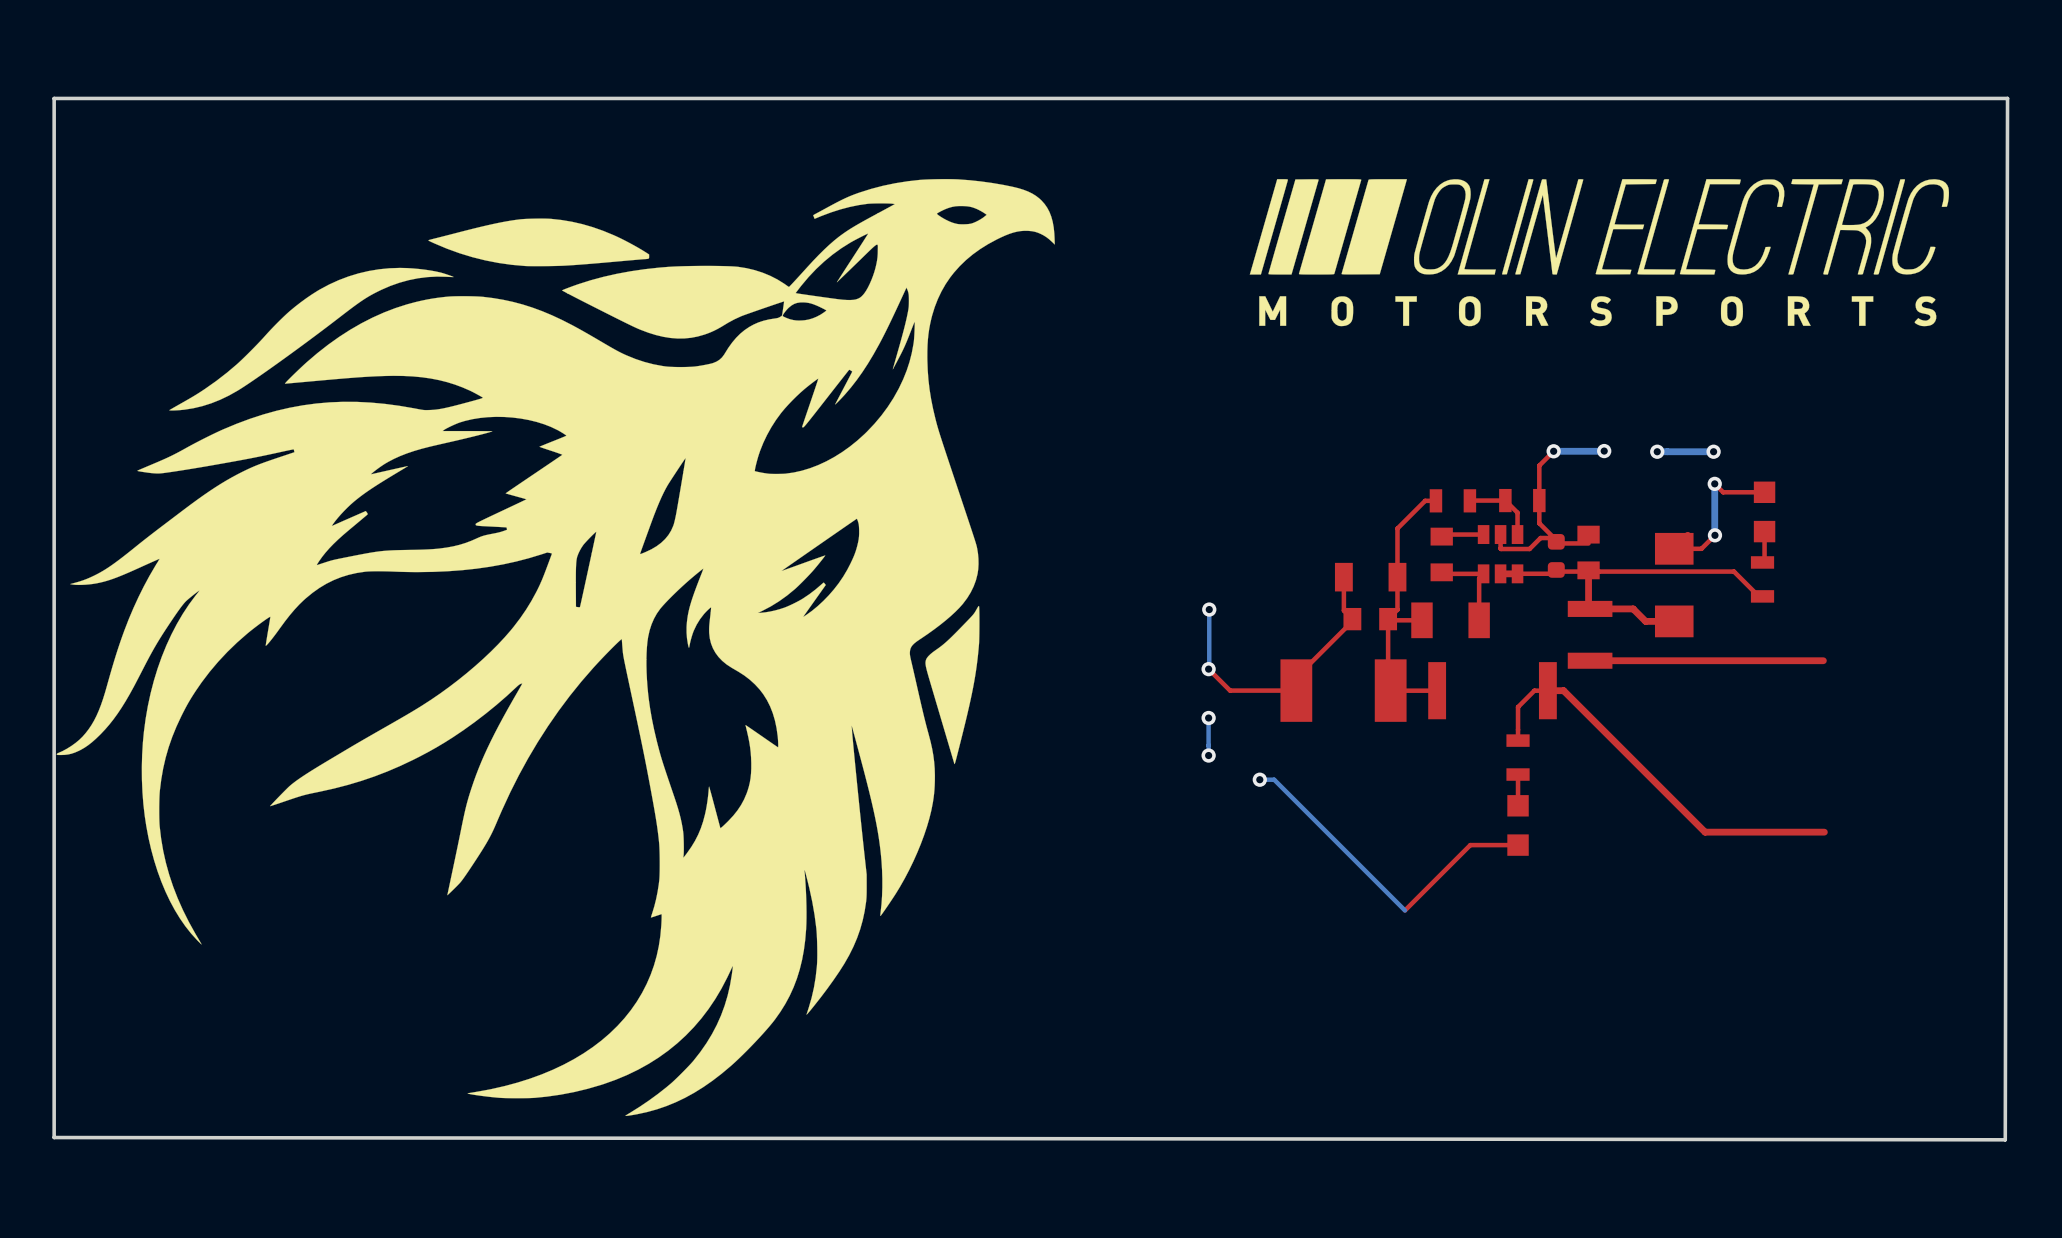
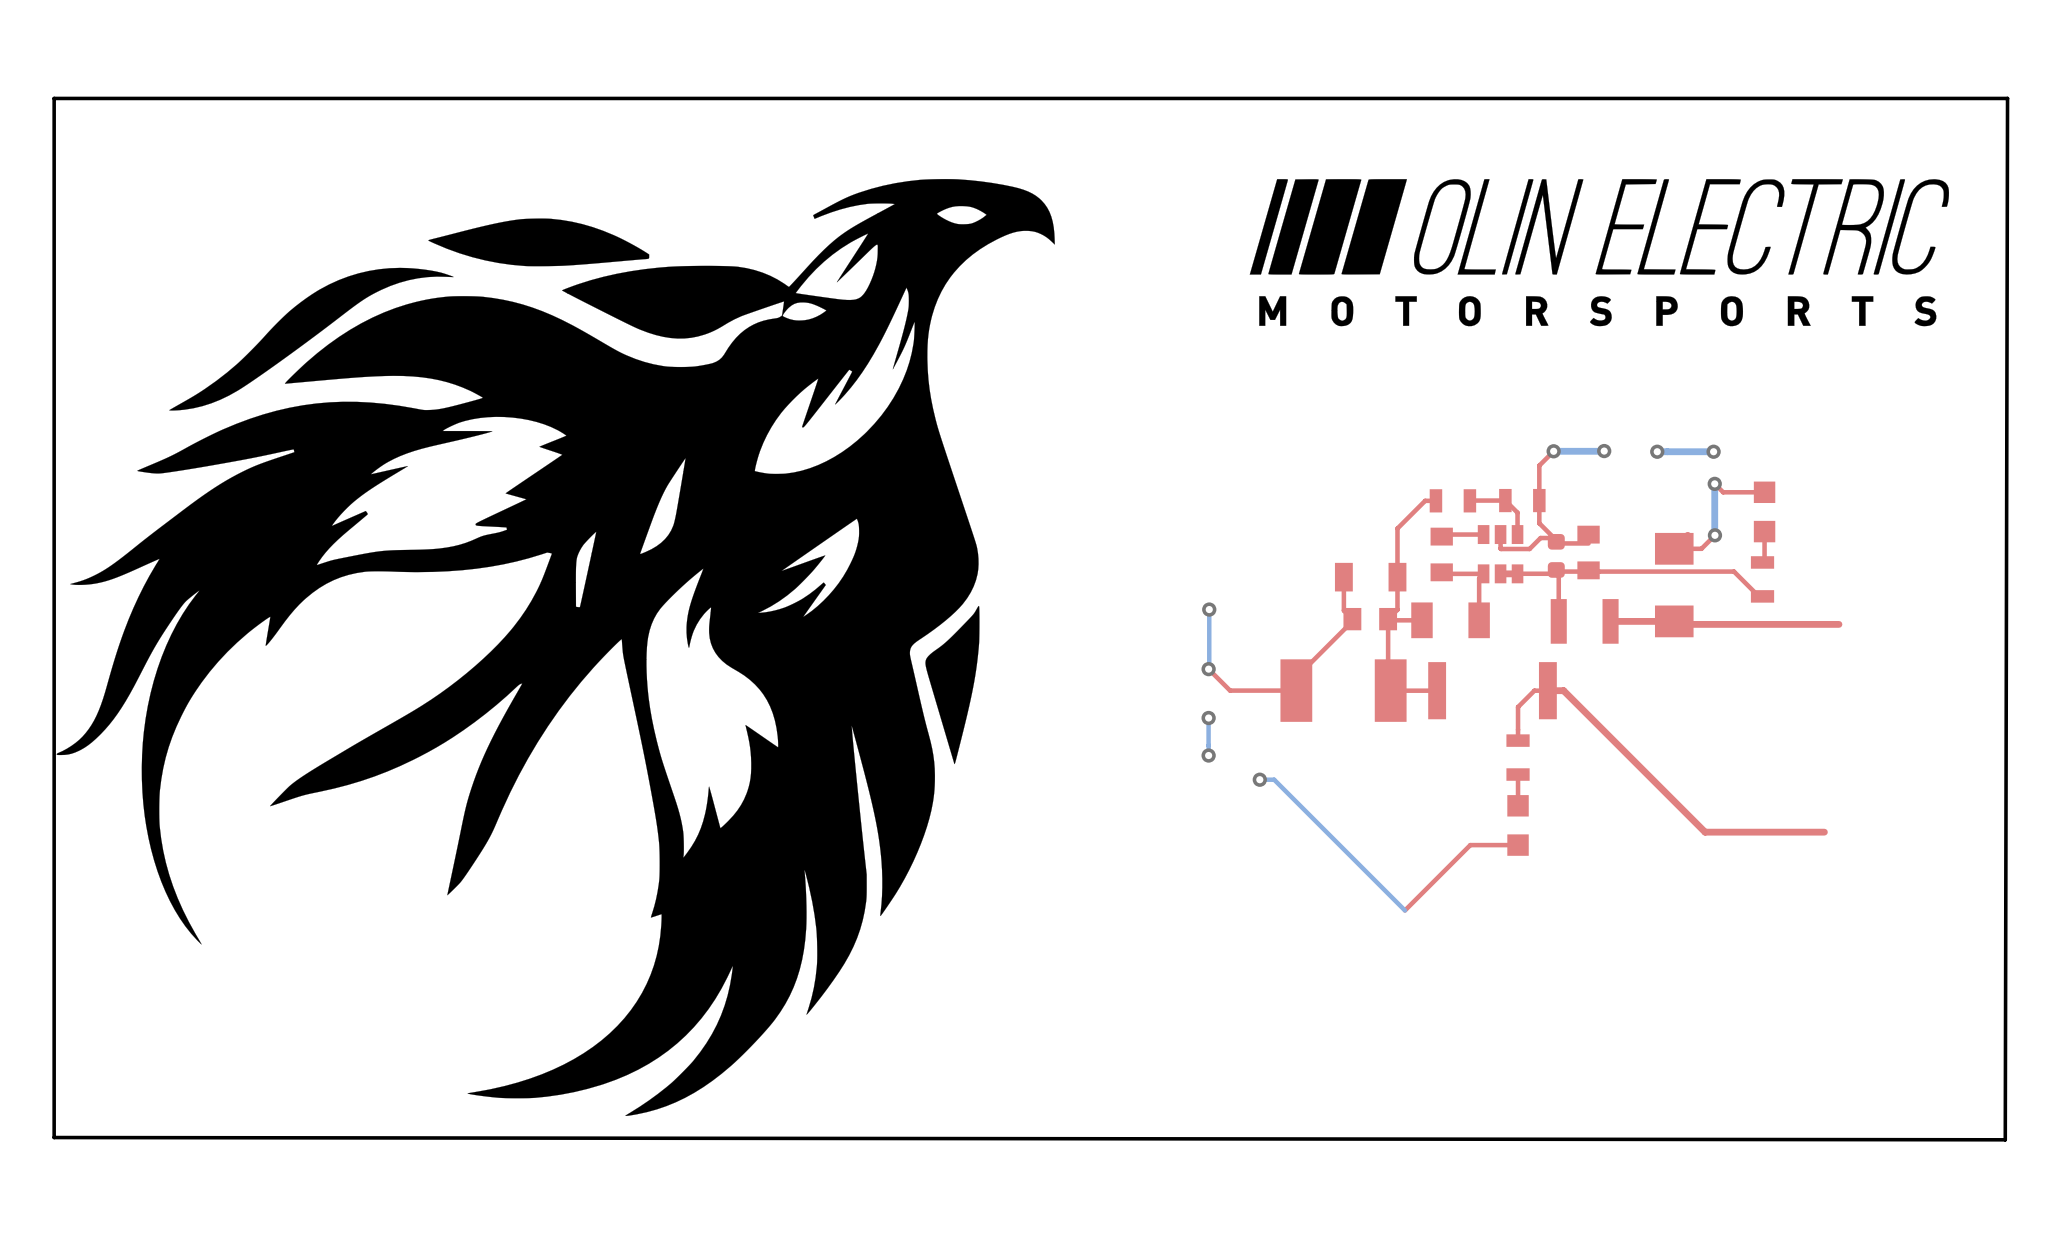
top track: (1588, 570) (1590, 608) (1633, 608) (1645, 621) -> (1610, 621) (1645, 621)
top track: none -> (1556, 573) (1558, 576) (1558, 621)
top track: none -> (1838, 624) (1677, 624)
part rotation: 0° (1590, 634) -> 90° clockwise (1584, 621)
top track: (1823, 660) (1590, 660) -> none

